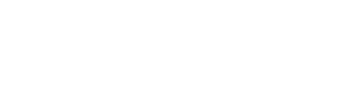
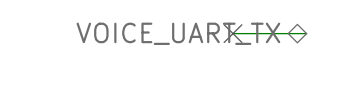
hierarchical label: none -> VOICE_UART_TX (178, 33)
wire: none -> (233, 33) (306, 33)
no-connect mark: none -> (233, 33)

